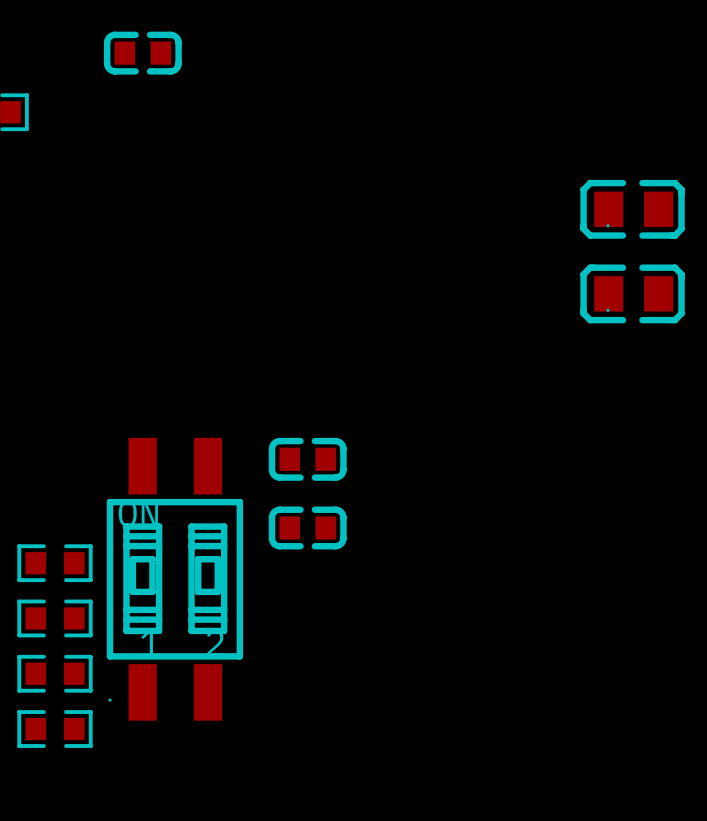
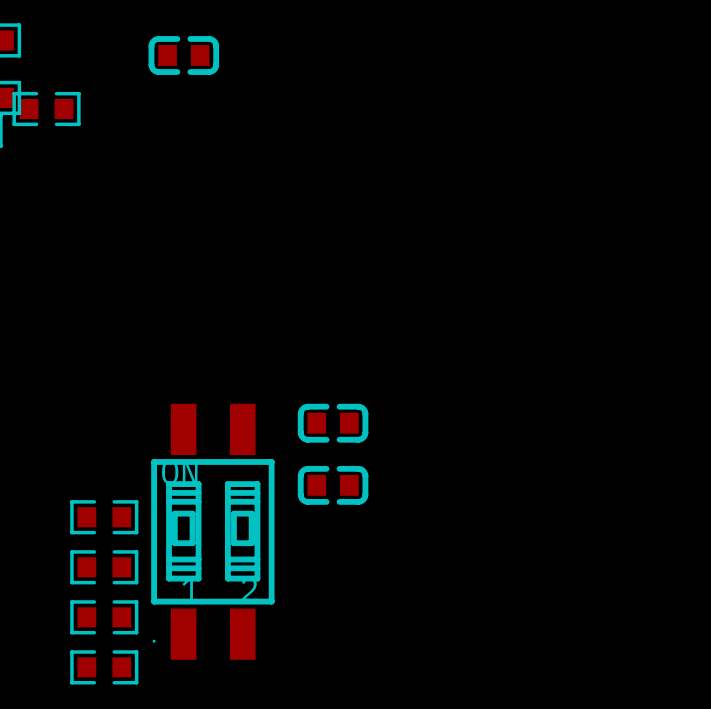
part: (632, 209) -> none
part: (632, 293) -> none

